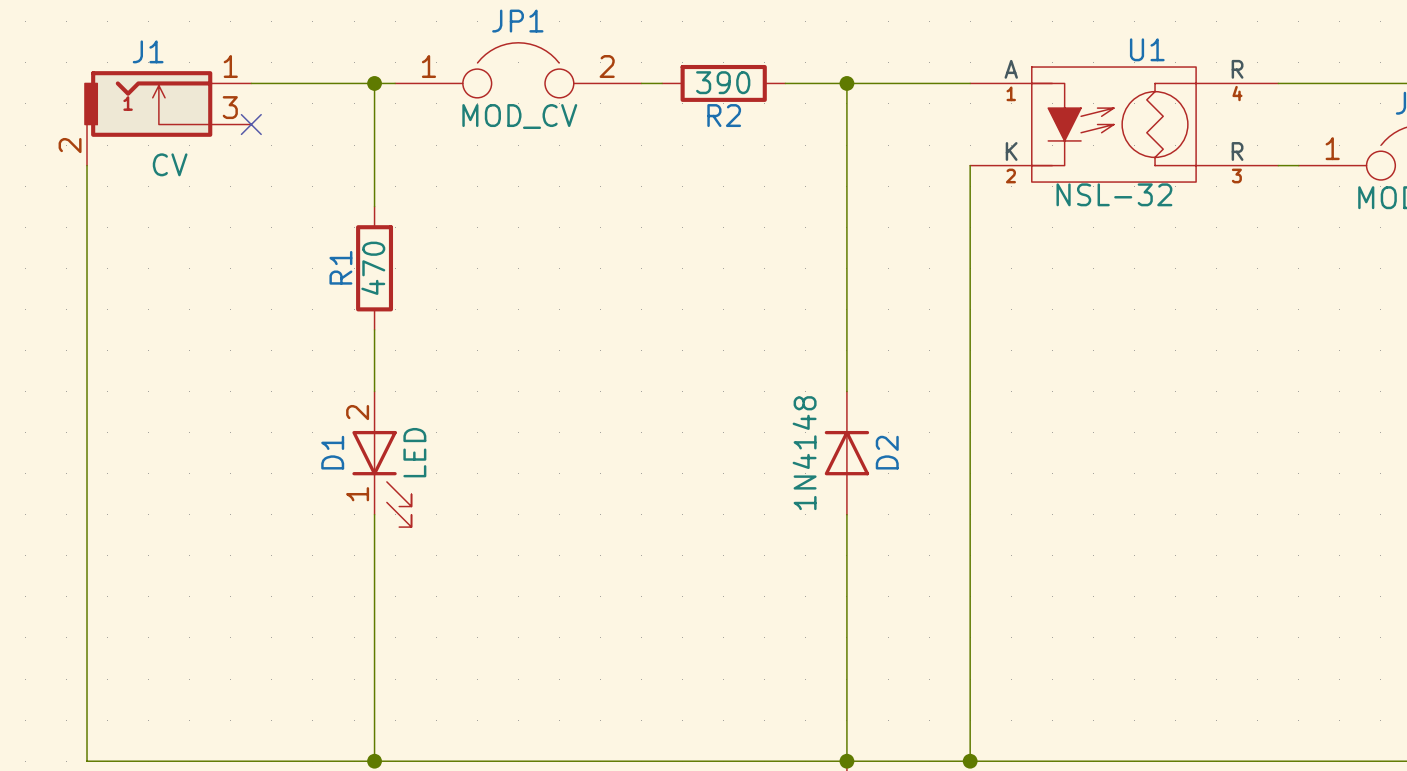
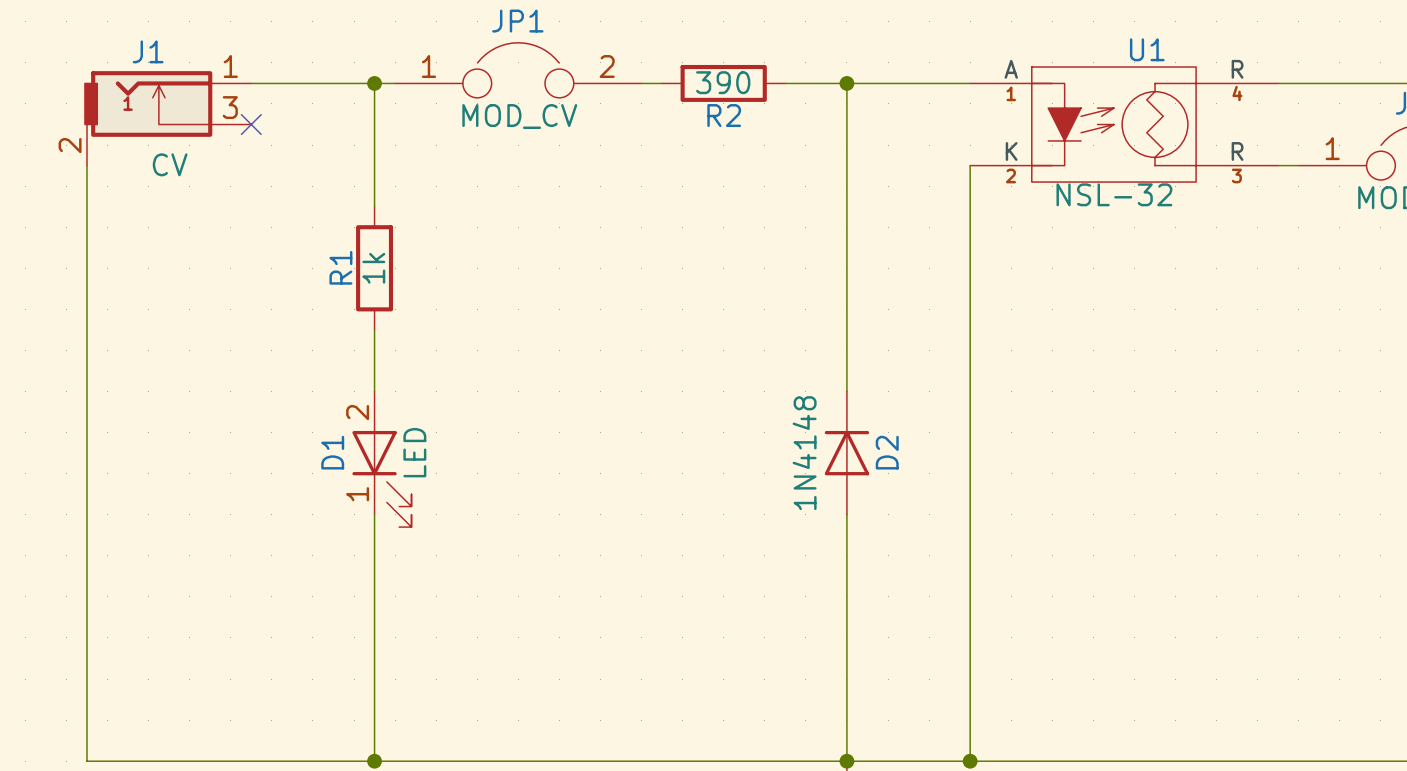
R1 value: 470 (373, 268) -> 1k (373, 268)

